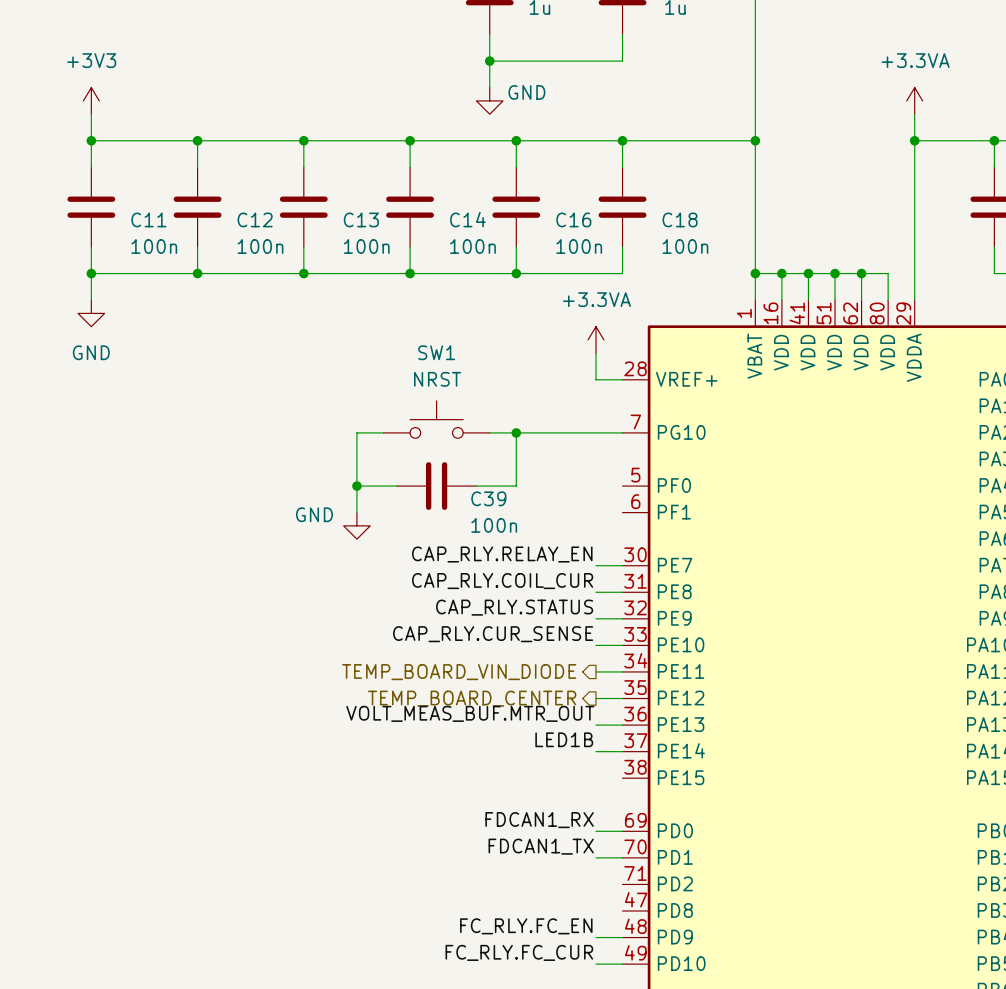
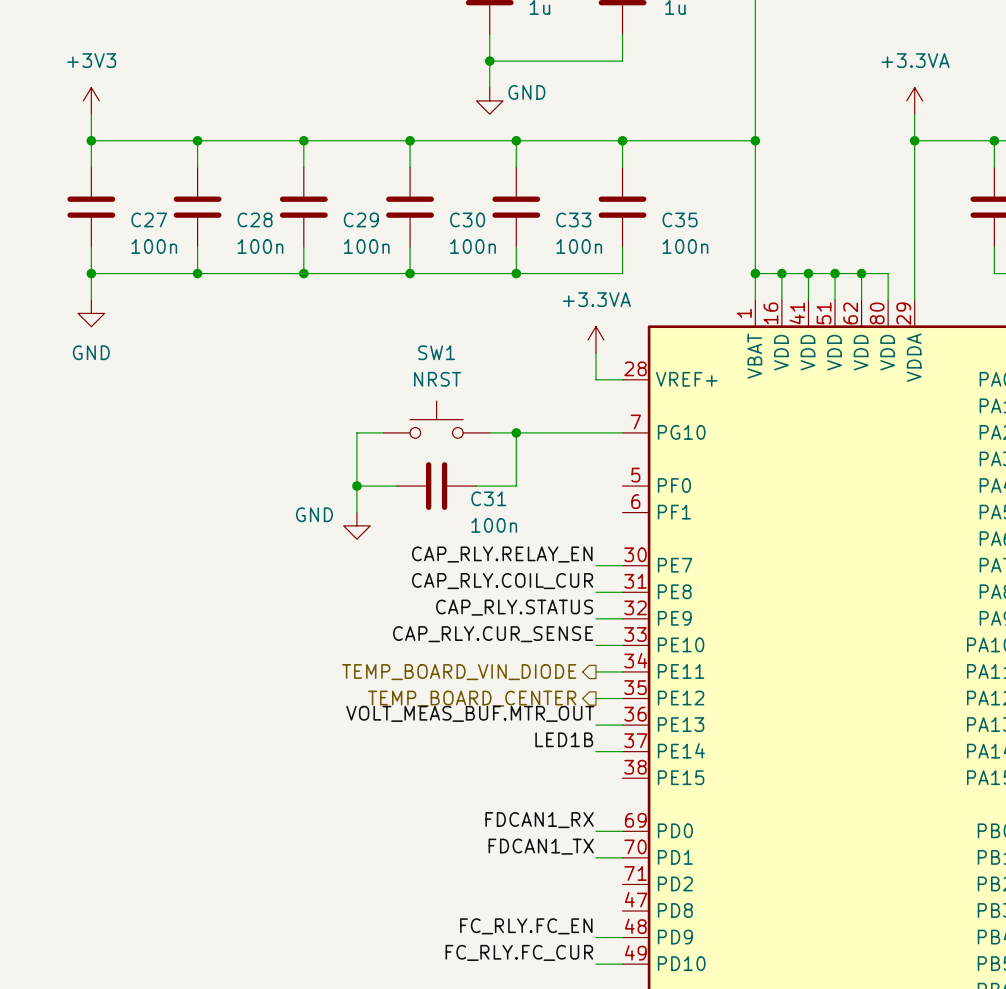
C11 name: C11 (148, 219) -> C27 (149, 219)
C12 name: C12 (255, 219) -> C28 (255, 219)
C13 name: C13 (361, 219) -> C29 (361, 219)
C14 name: C14 (467, 219) -> C30 (467, 219)
C16 name: C16 (573, 219) -> C33 (573, 219)
C18 name: C18 (680, 219) -> C35 (680, 219)
C39 name: C39 (488, 498) -> C31 (488, 498)

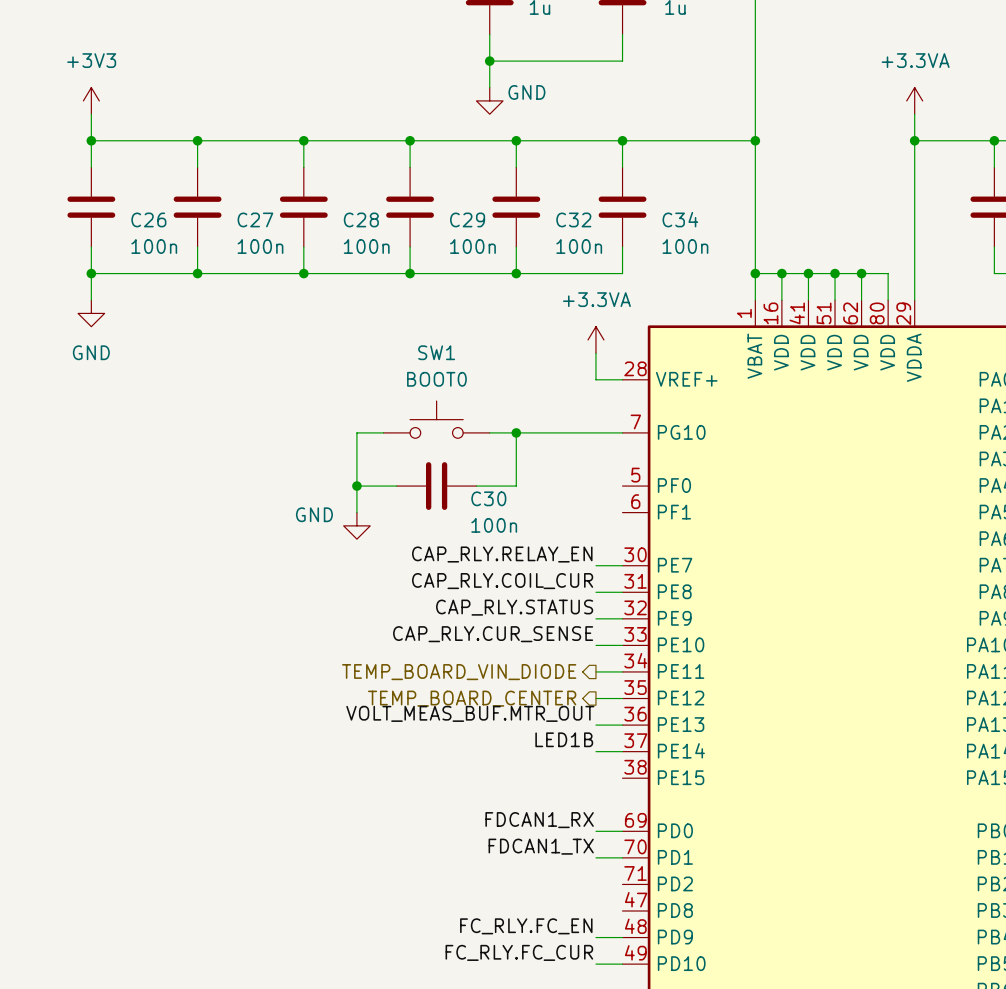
C27 name: C27 (149, 219) -> C26 (148, 219)
C28 name: C28 (255, 219) -> C27 (255, 219)
C29 name: C29 (361, 219) -> C28 (361, 219)
C30 name: C30 (467, 219) -> C29 (467, 219)
C33 name: C33 (573, 219) -> C32 (573, 219)
C35 name: C35 (680, 219) -> C34 (680, 219)
SW1 value: NRST (437, 379) -> BOOT0 (436, 379)
C31 name: C31 (488, 498) -> C30 (488, 498)

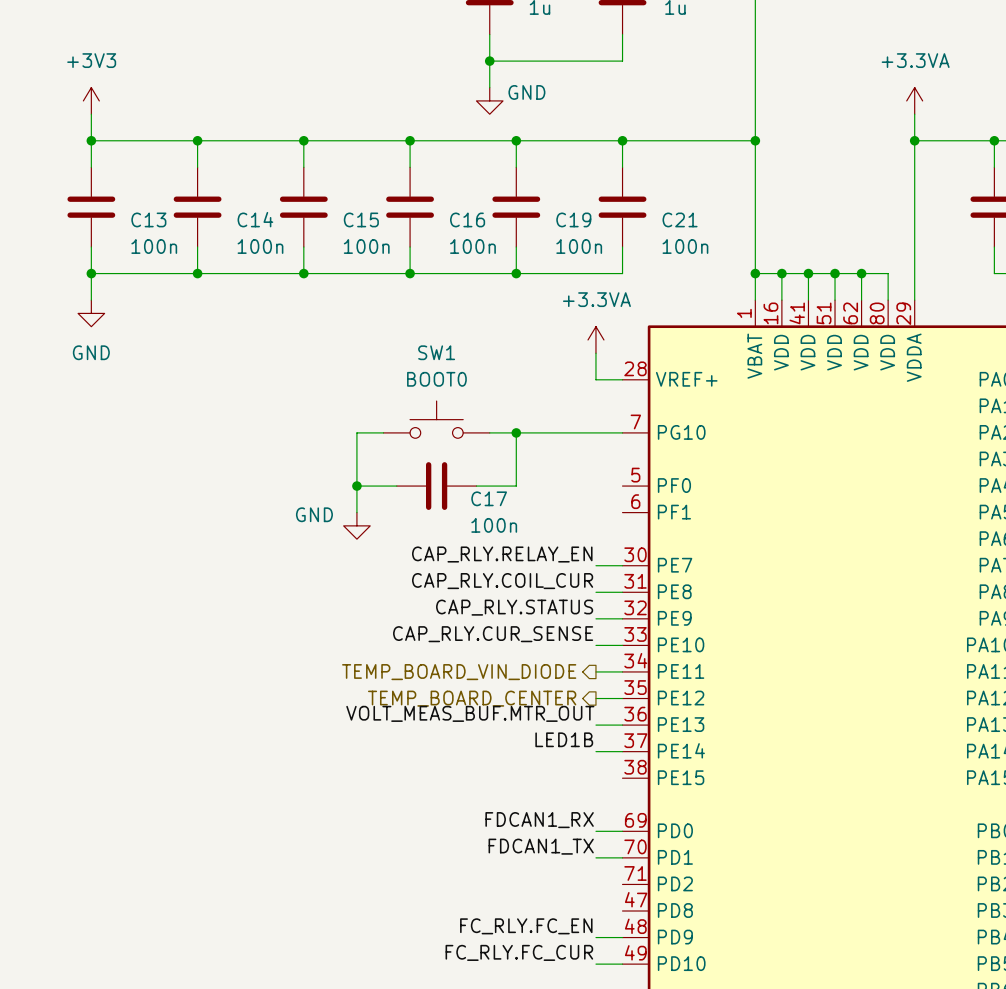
C26 name: C26 (148, 219) -> C13 (148, 219)
C27 name: C27 (255, 219) -> C14 (255, 219)
C28 name: C28 (361, 219) -> C15 (361, 219)
C29 name: C29 (467, 219) -> C16 (467, 219)
C32 name: C32 (573, 219) -> C19 (573, 219)
C34 name: C34 (680, 219) -> C21 (680, 219)
C30 name: C30 (488, 498) -> C17 (489, 498)

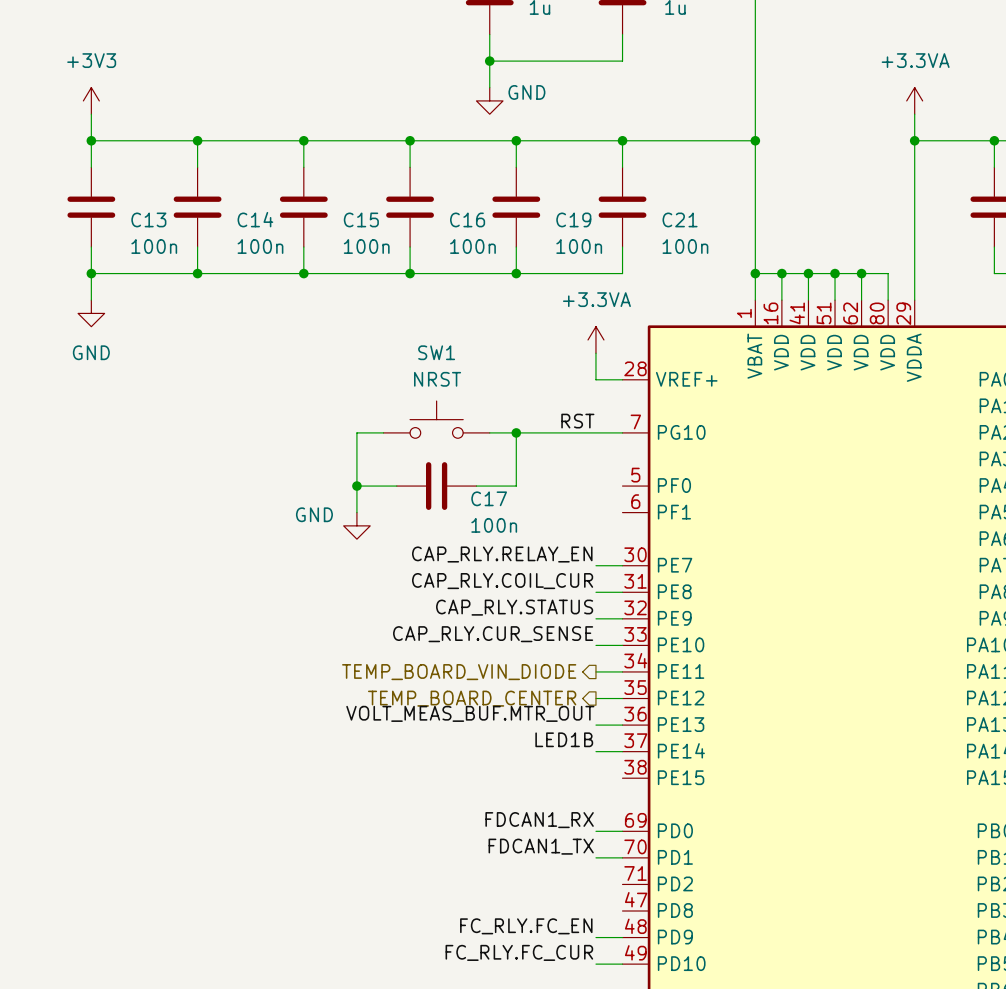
SW1 value: BOOT0 (436, 379) -> NRST (437, 379)
label: none -> RST (577, 421)

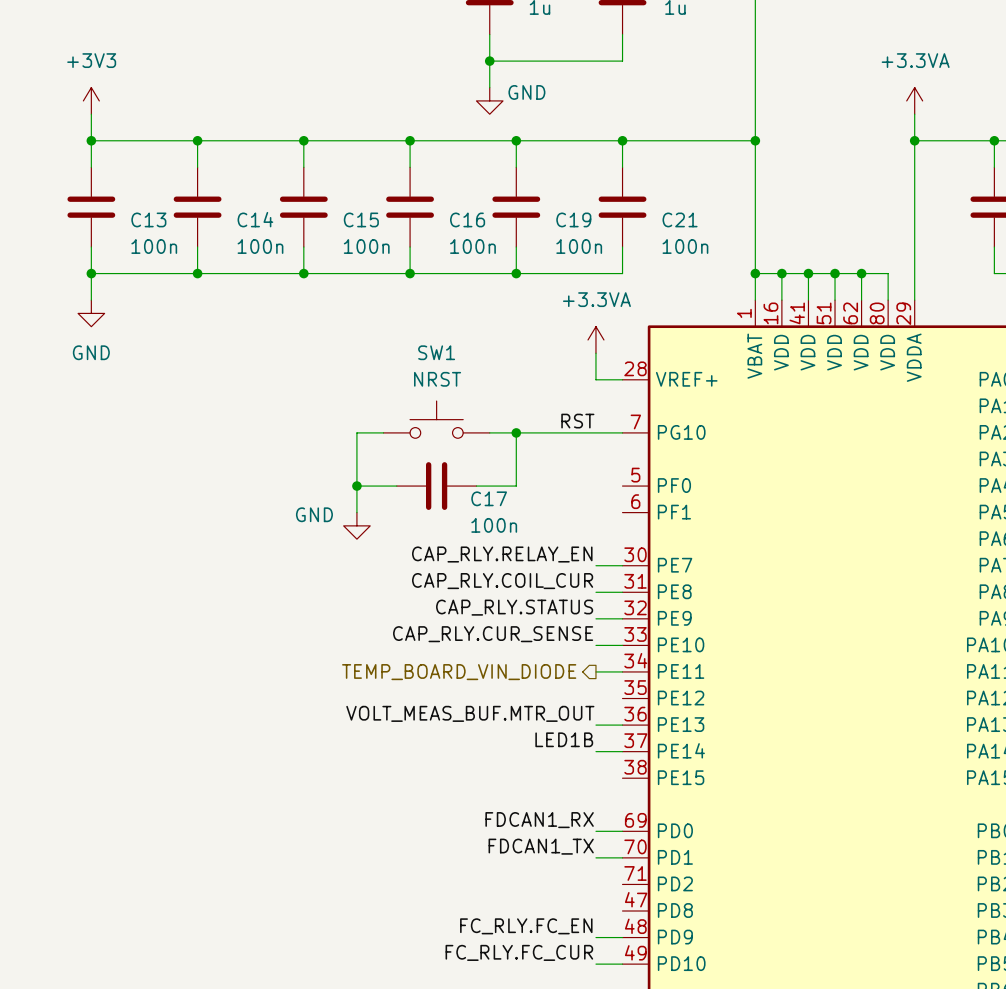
hierarchical label: TEMP_BOARD_CENTER (472, 698) -> none
wire: (595, 698) (622, 698) -> none

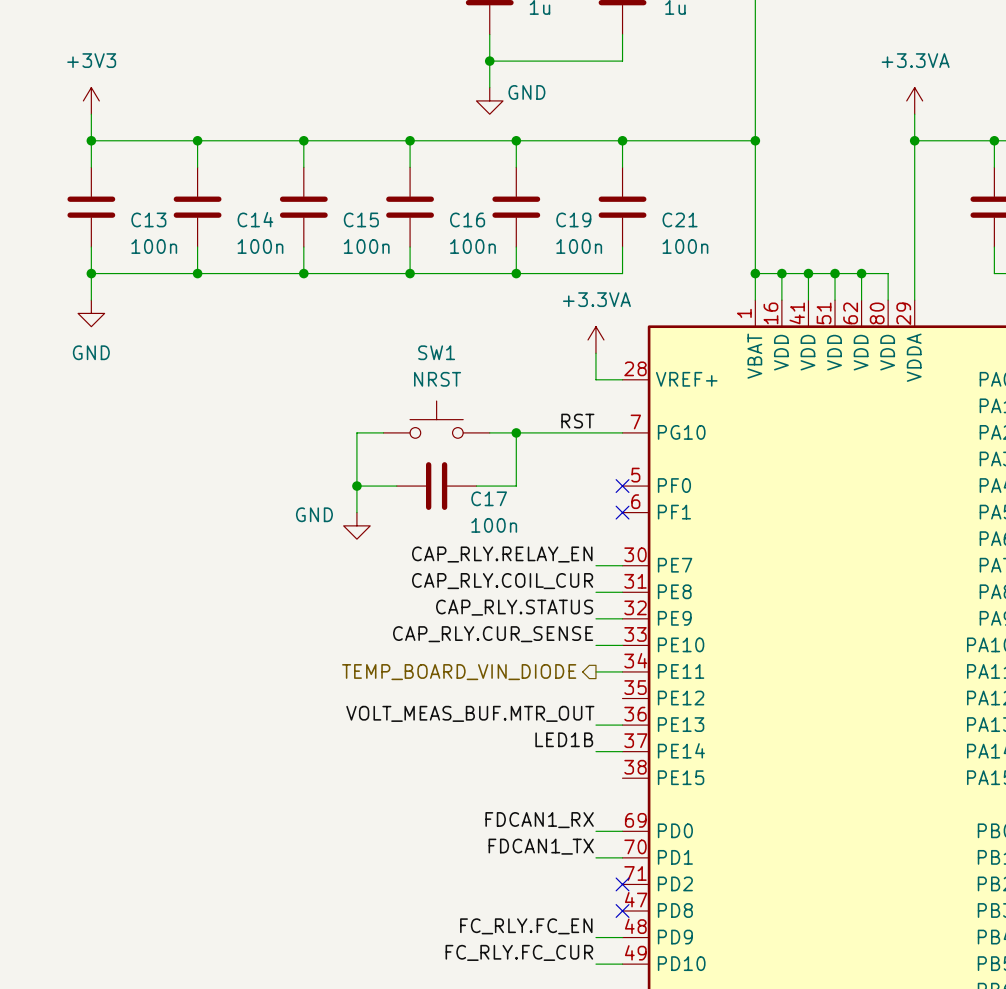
no-connect mark: none -> (622, 486)
no-connect mark: none -> (622, 512)
no-connect mark: none -> (622, 884)
no-connect mark: none -> (622, 911)

